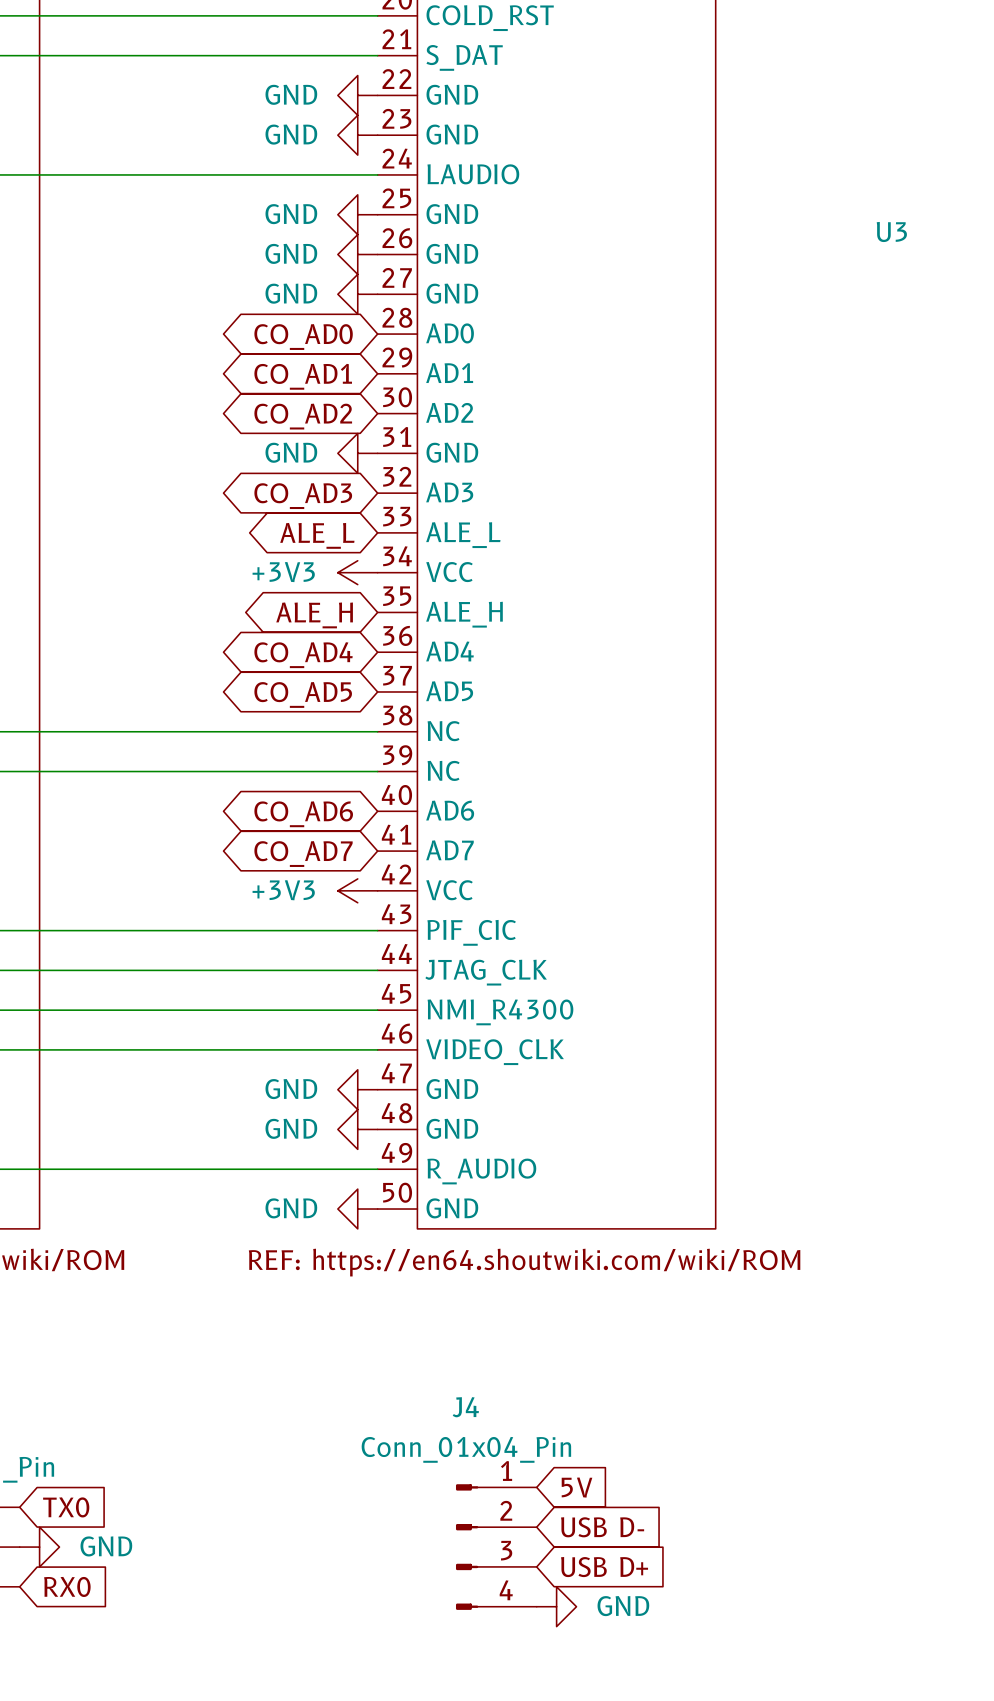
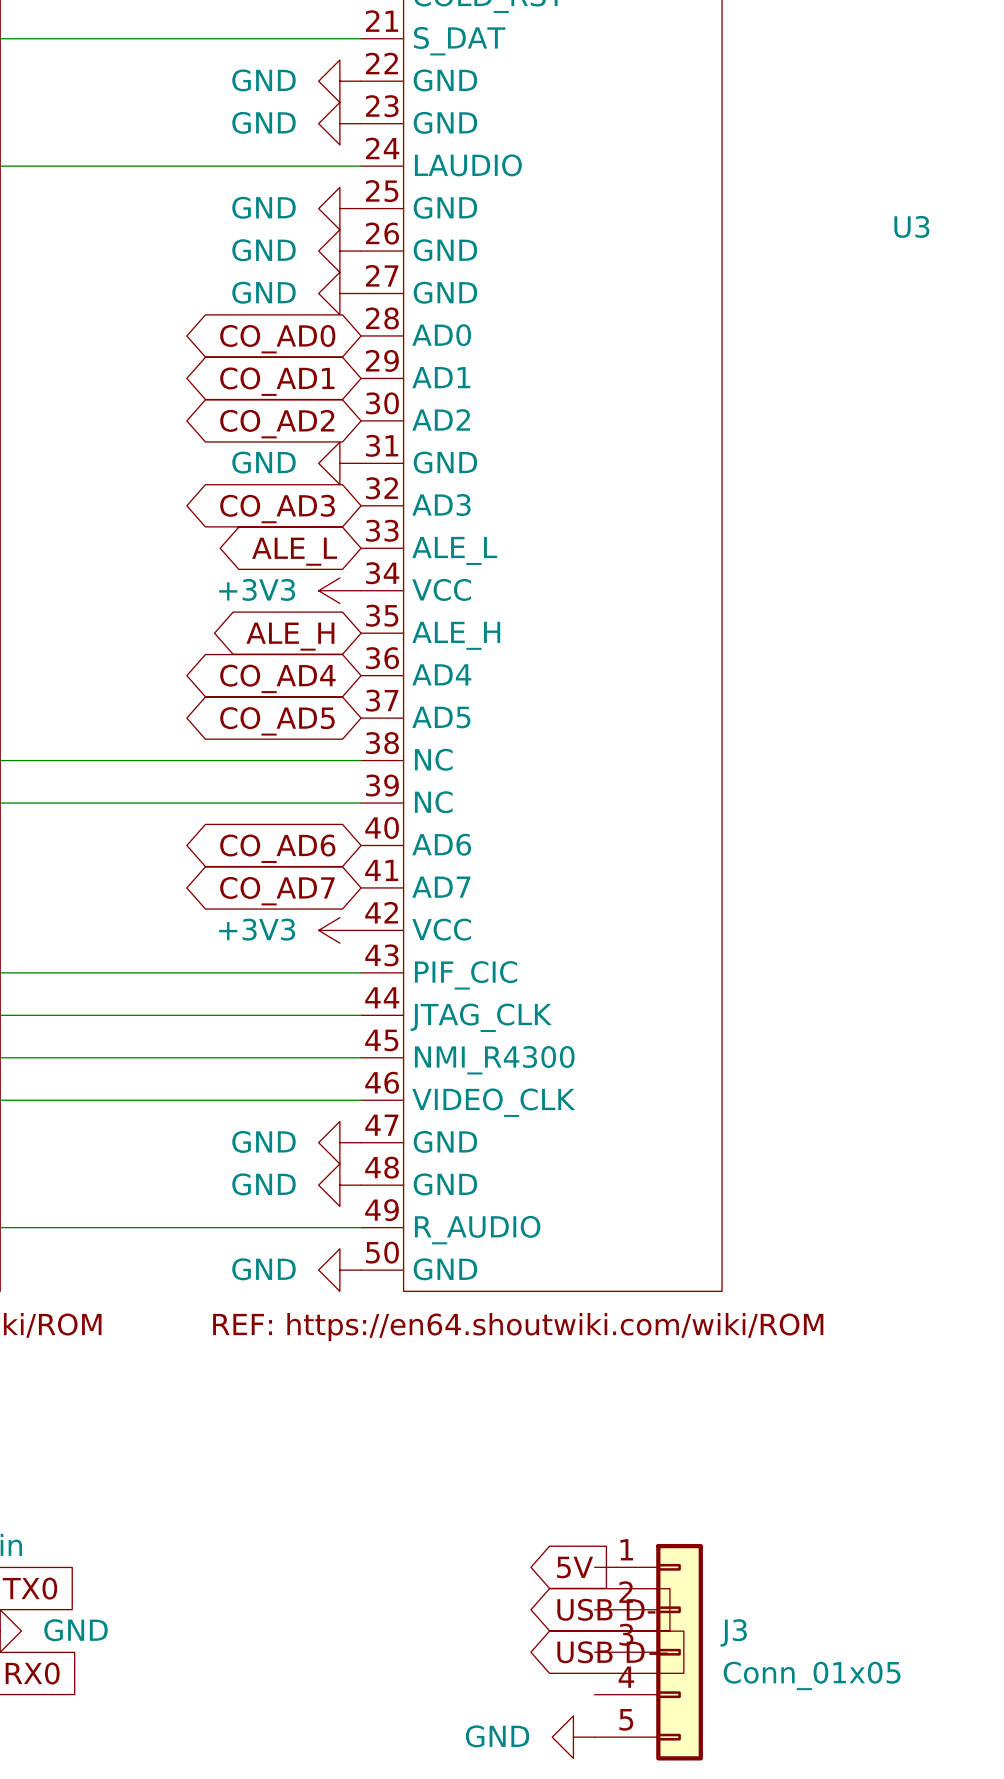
J4: Conn_01x04_Pin (496, 1547) -> none
J3: none -> Conn_01x05 (648, 1652)
power symbol rotation: 0° (556, 1606) -> 180° (573, 1737)
power symbol position: GND (556, 1606) -> GND (573, 1737)

